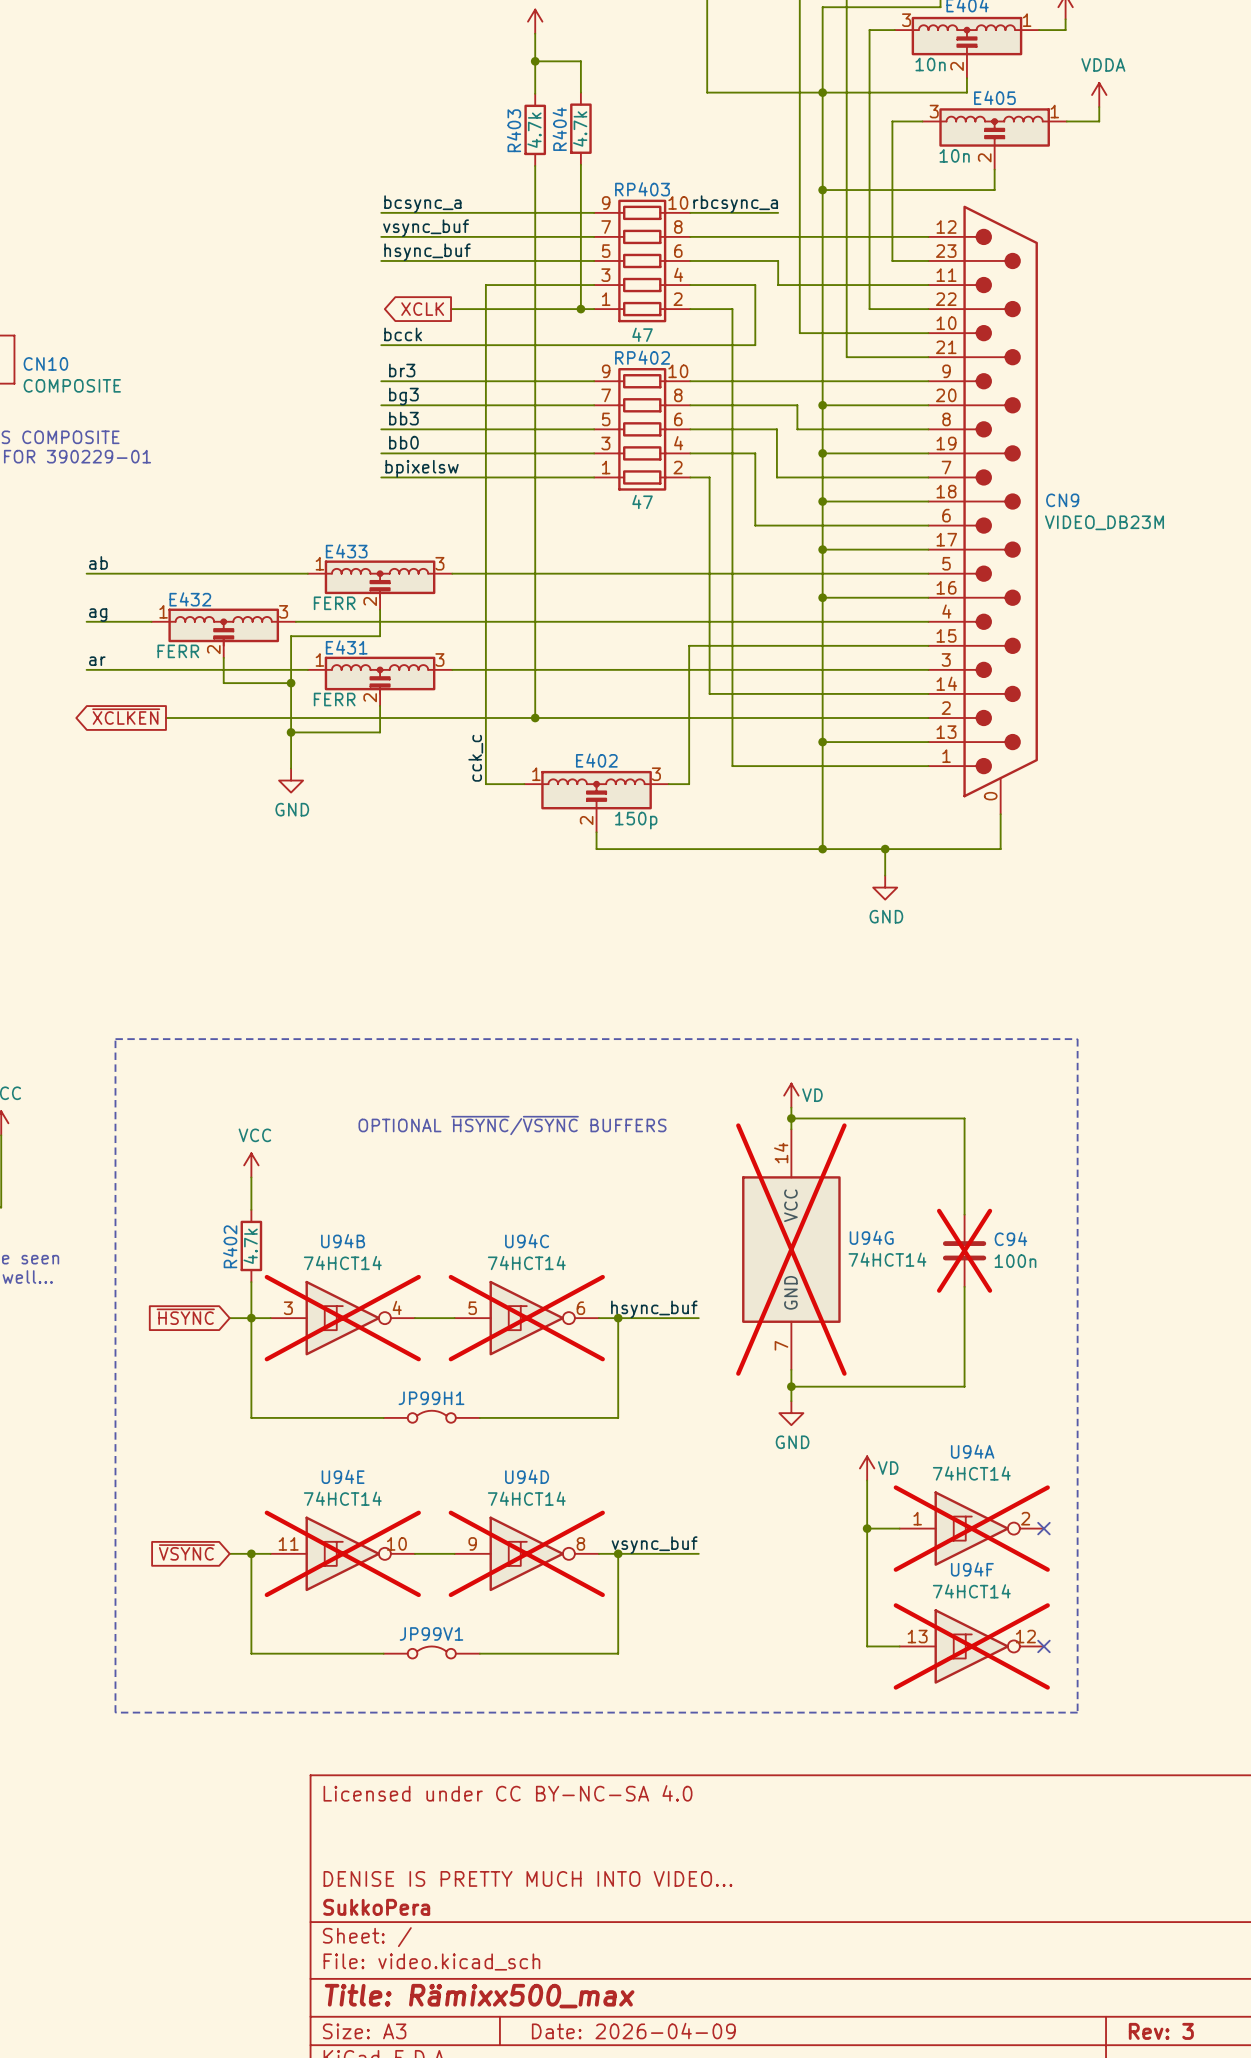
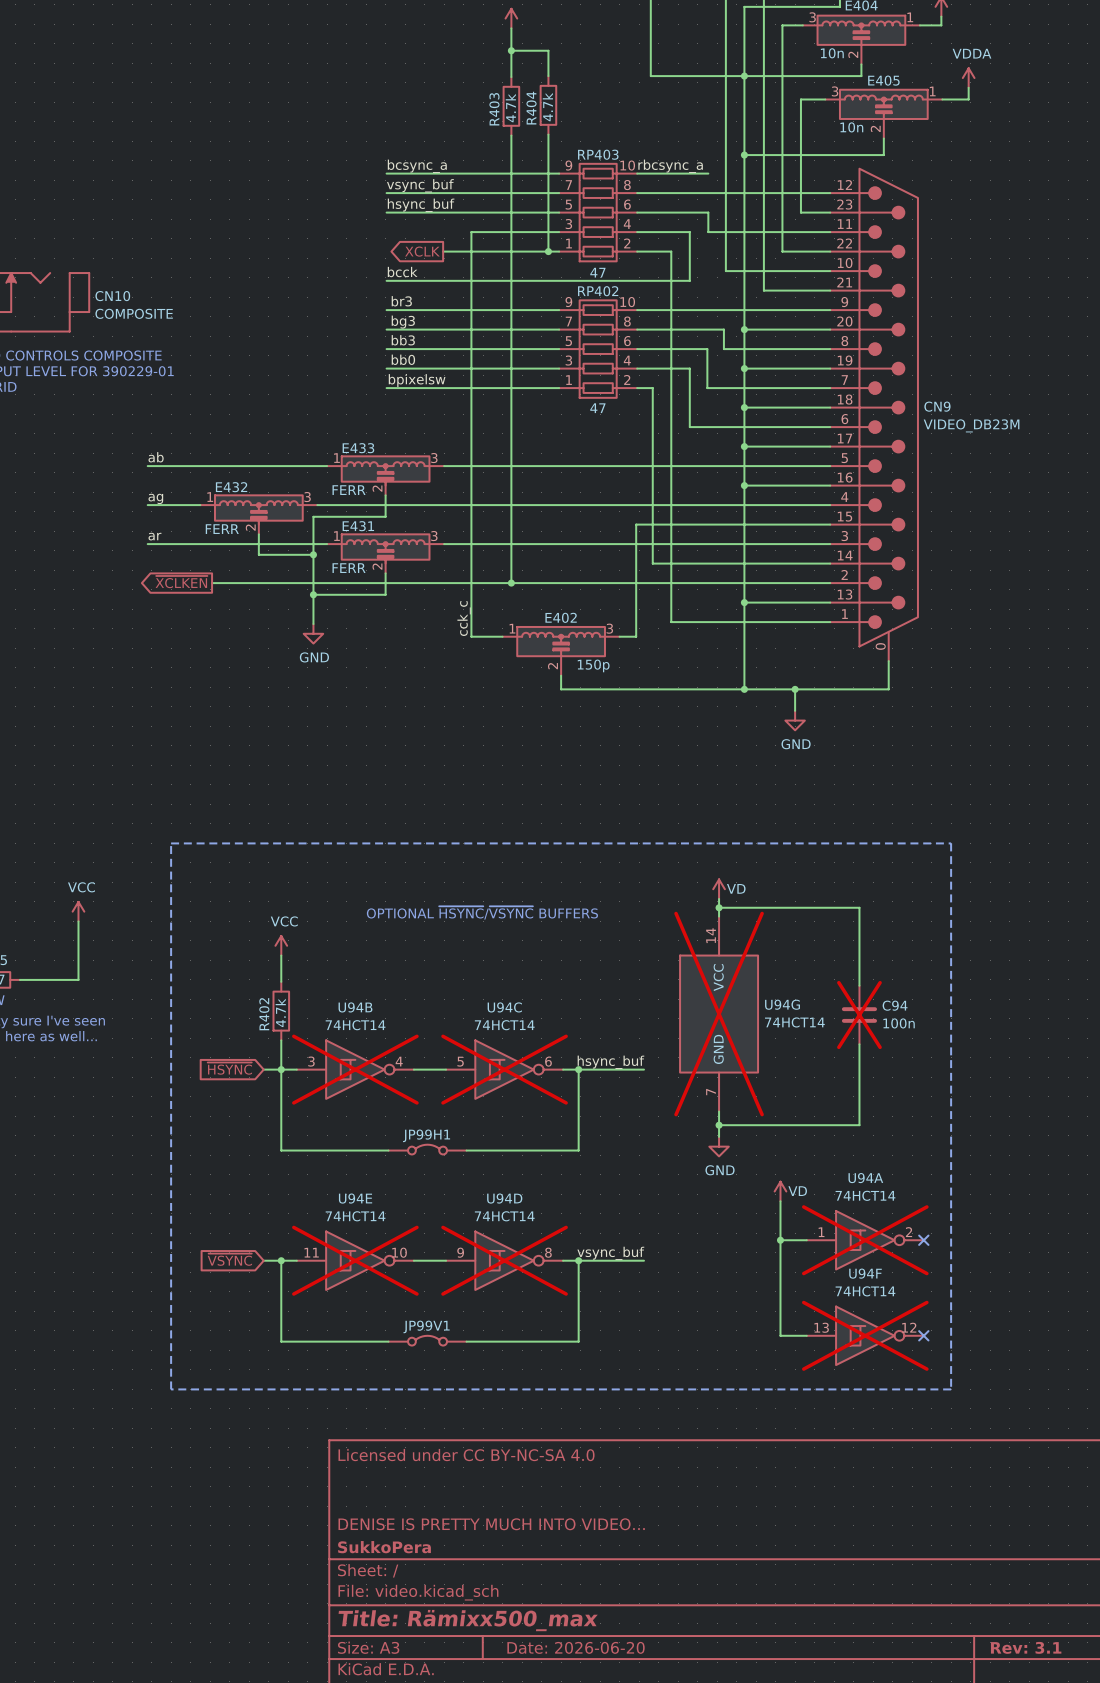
title block: Date: 2026-04-09 (633, 2031) -> Date: 2026-06-20 (576, 1647)
title block: Rev: 3 (1161, 2031) -> Rev: 3.1 (1026, 1647)

